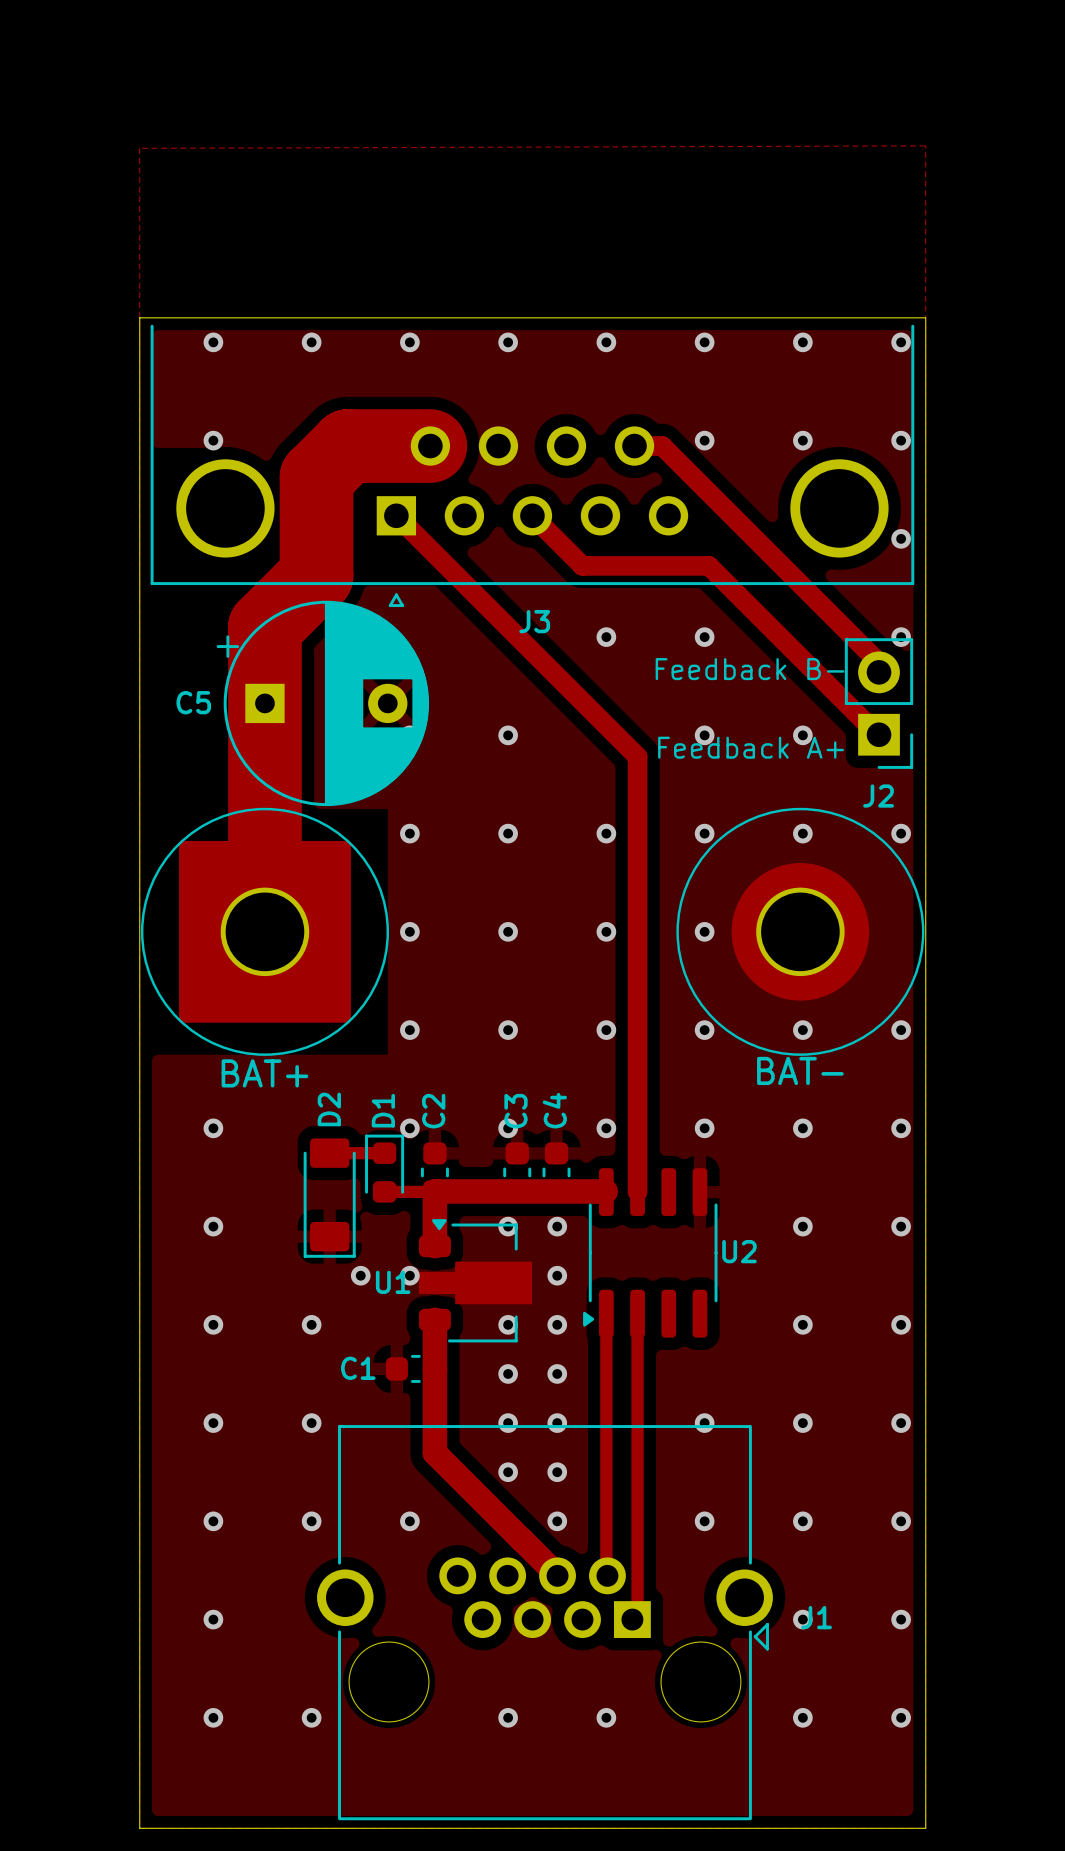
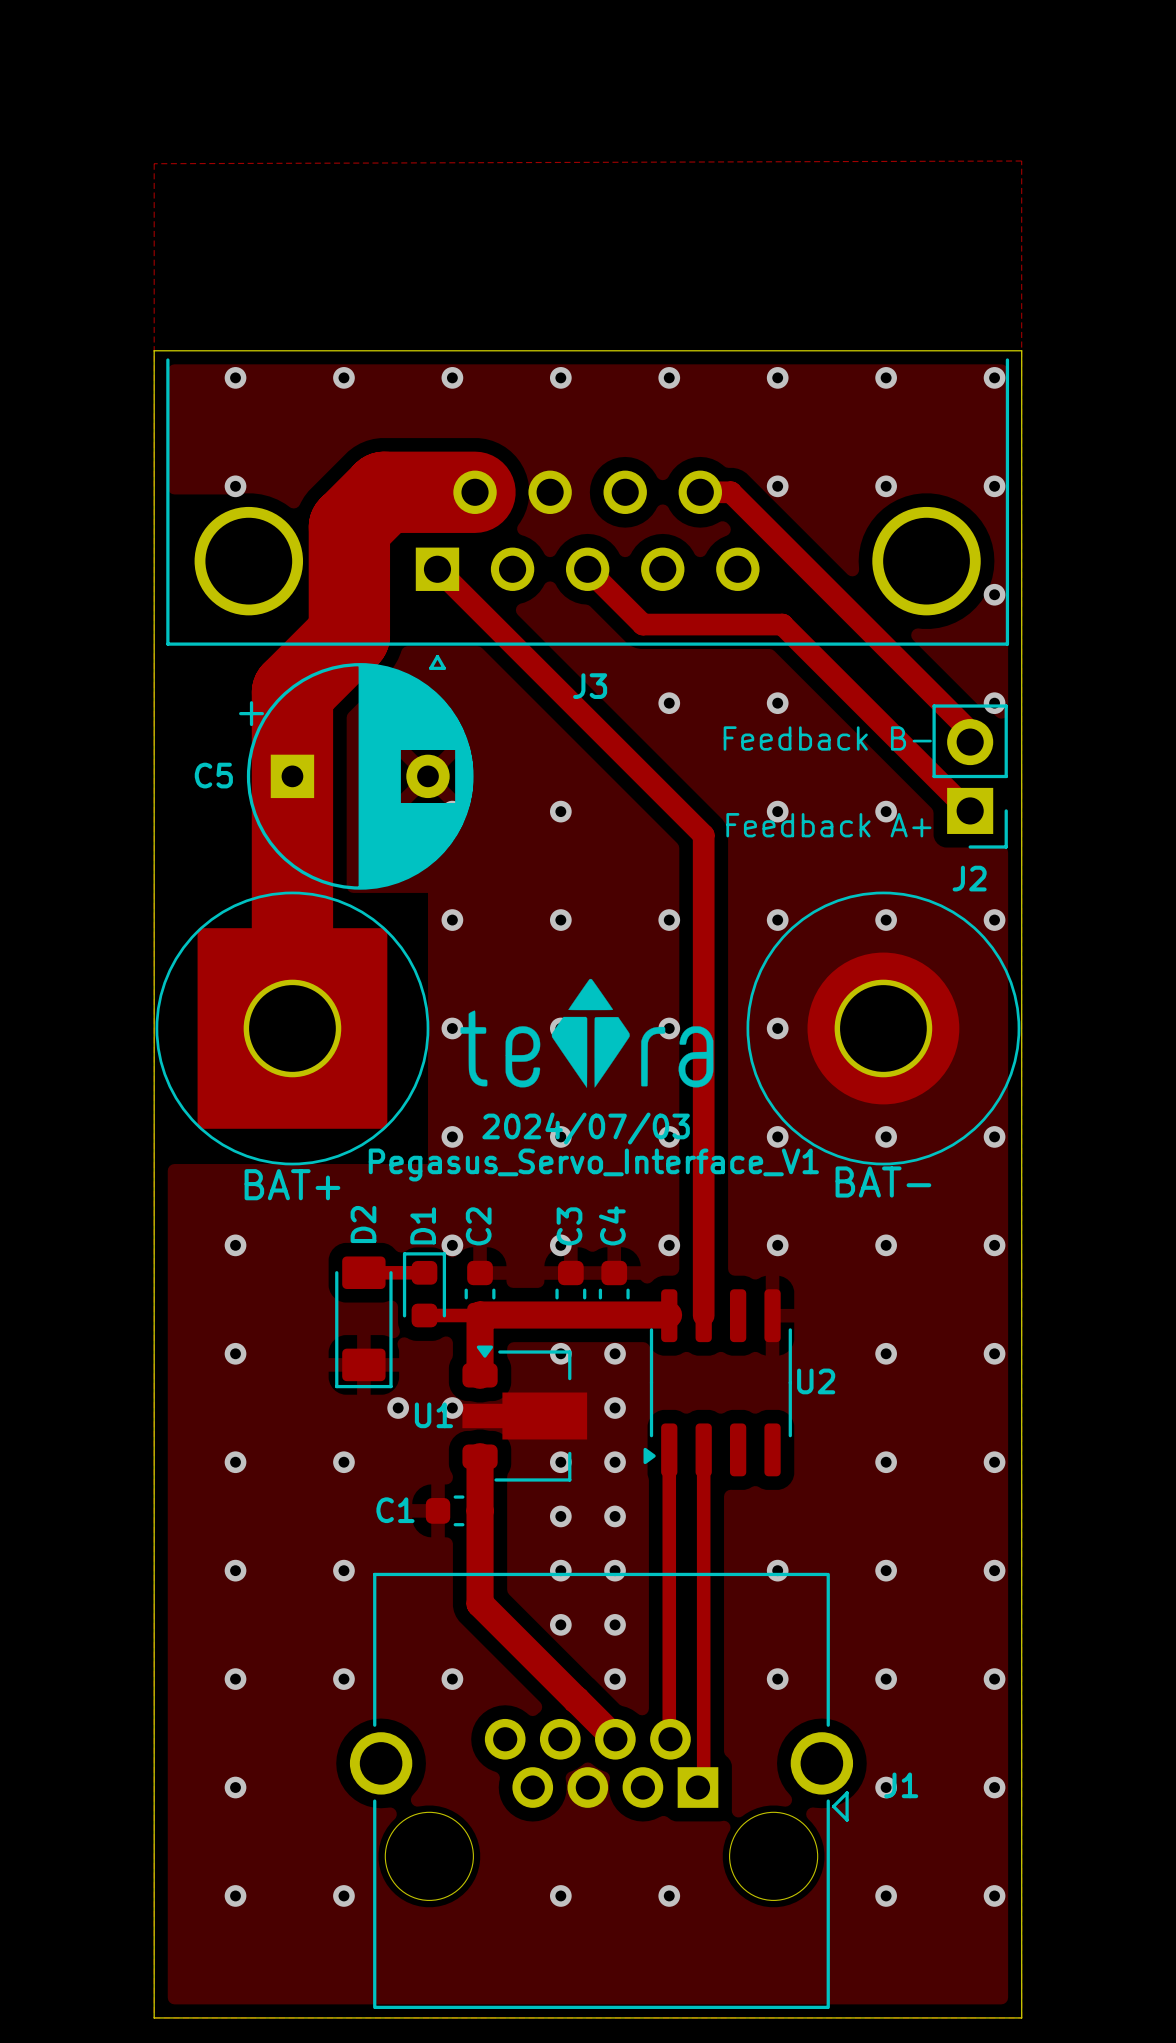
drawing: none -> [460, 978, 714, 1088]
text: none -> 2024/07/03 (586, 1128)
text: none -> Pegasus_Servo_Interface_V1 (593, 1164)

